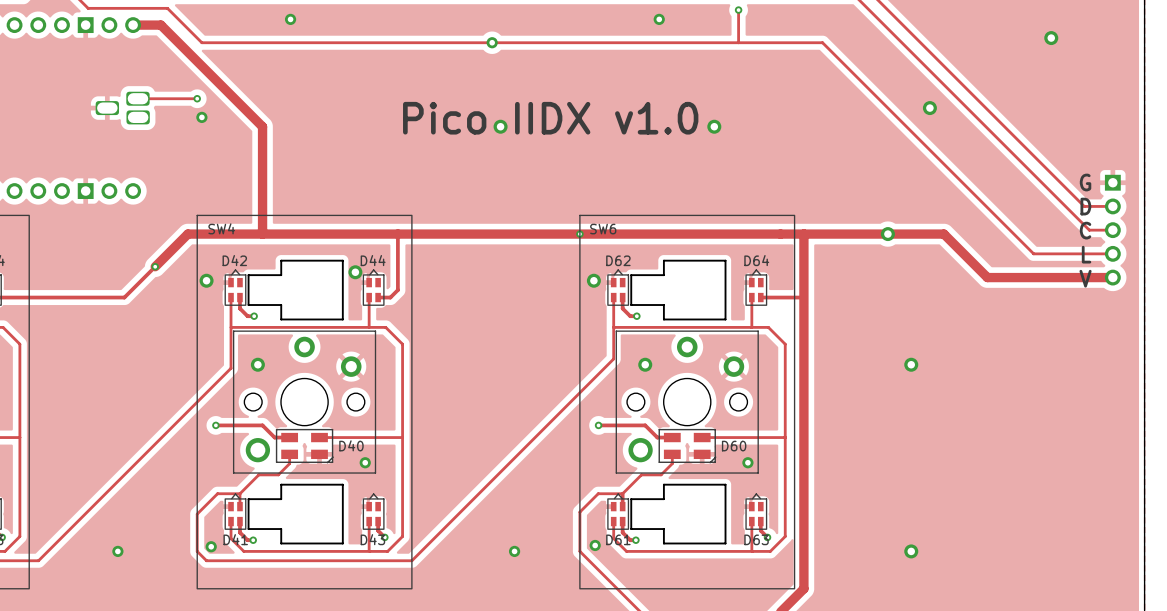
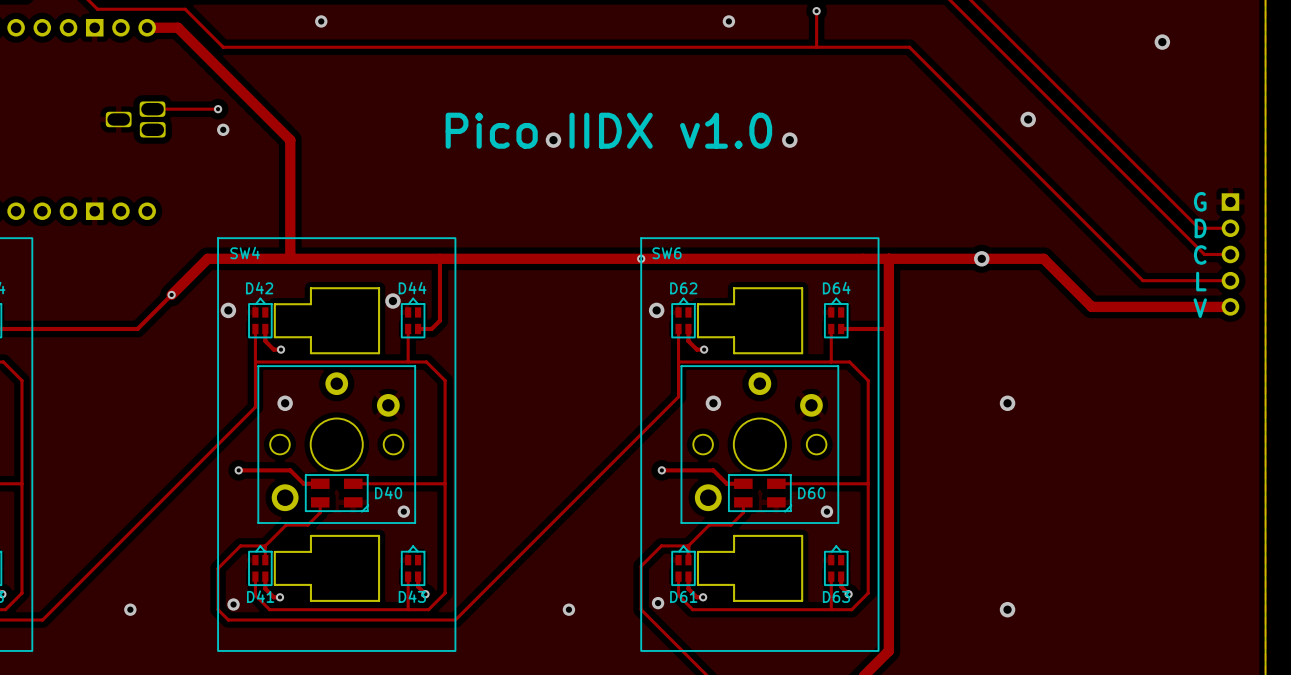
via: (492, 42) -> none

